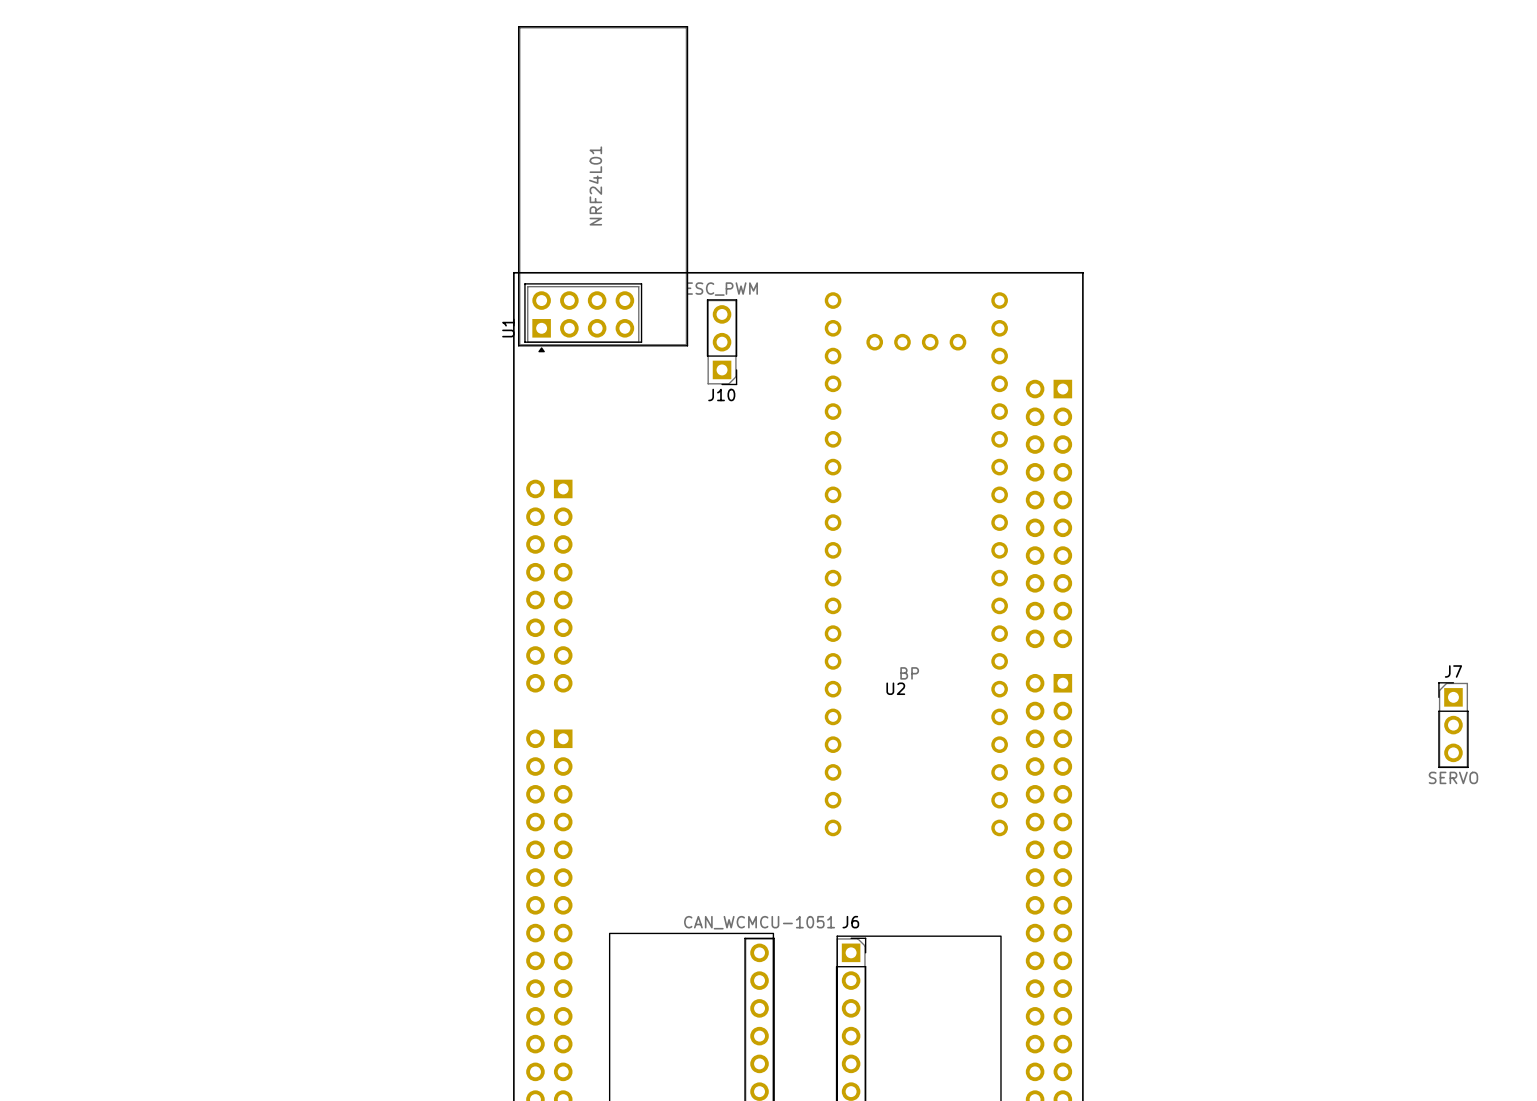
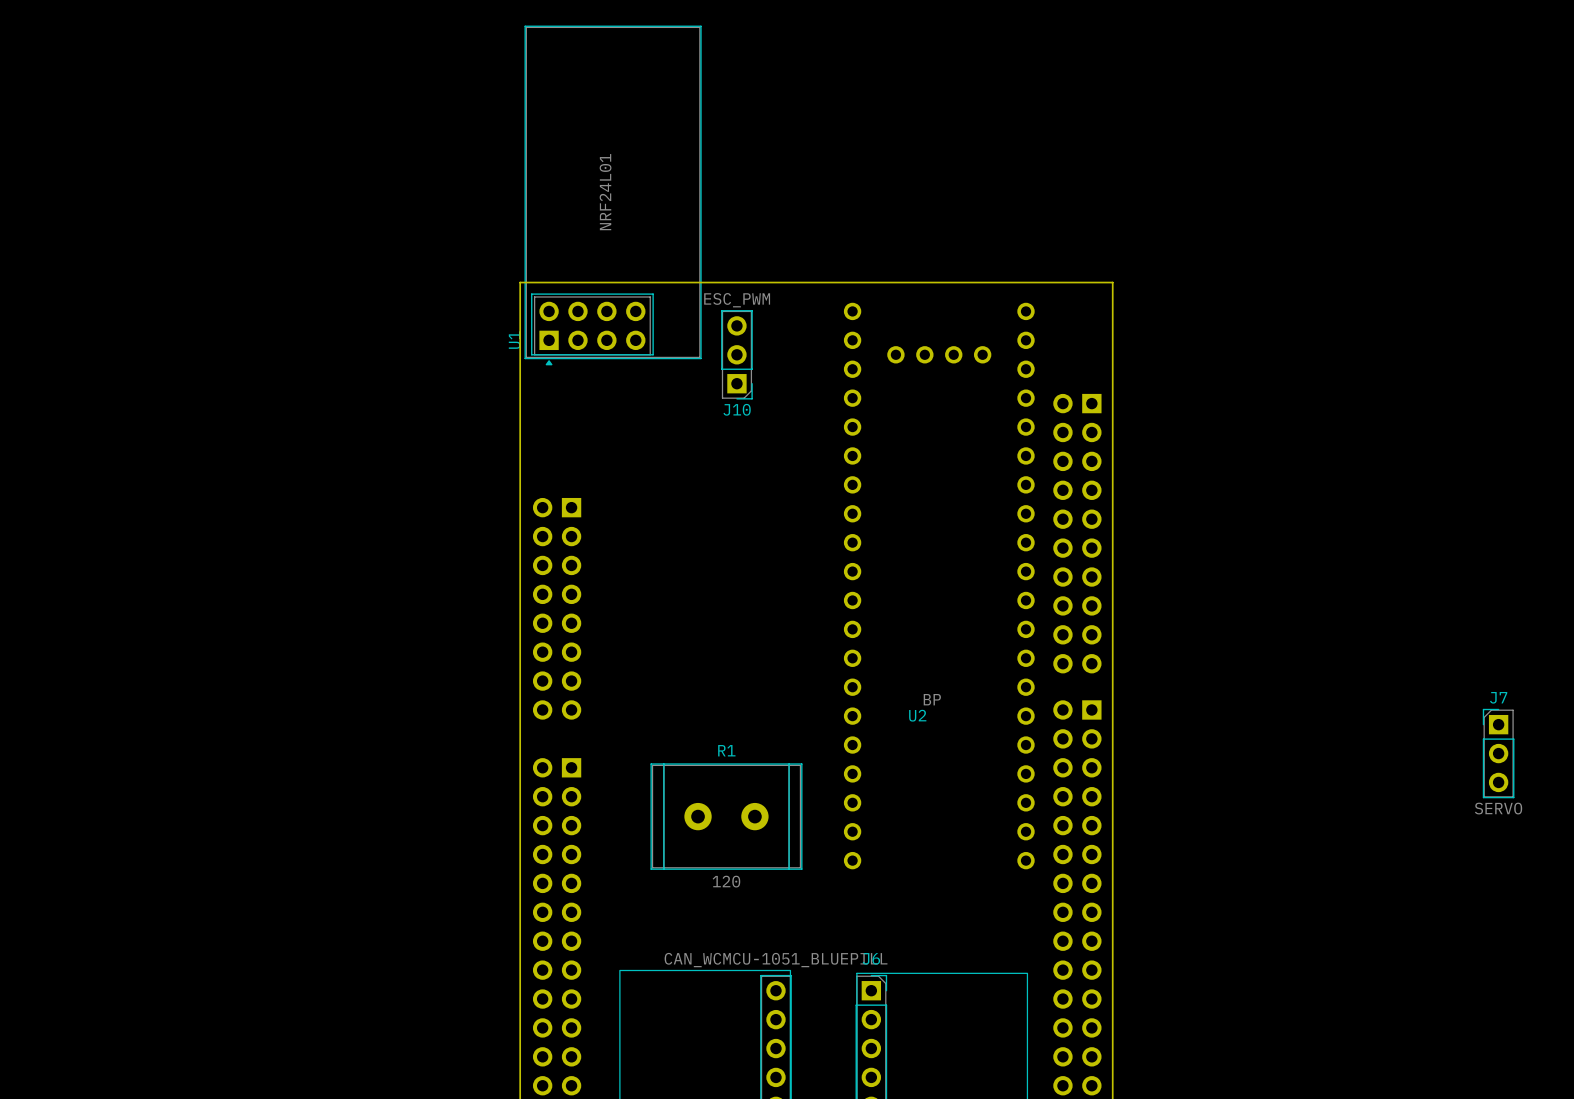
R1: none -> 120 (726, 816)
part value: CAN_WCMCU-1051 (759, 922) -> CAN_WCMCU-1051_BLUEPILL (776, 960)

